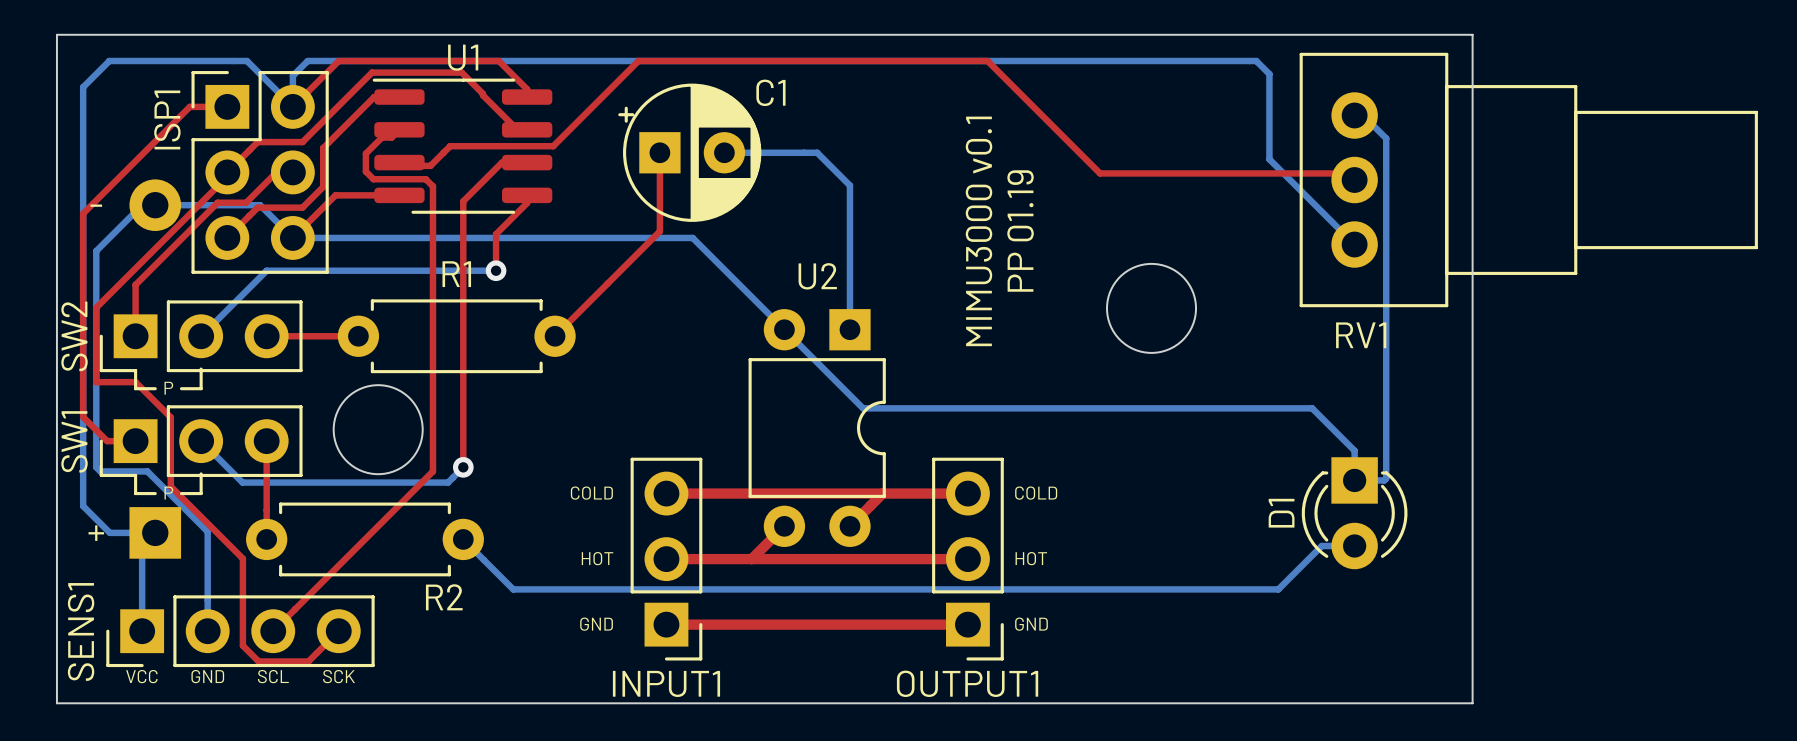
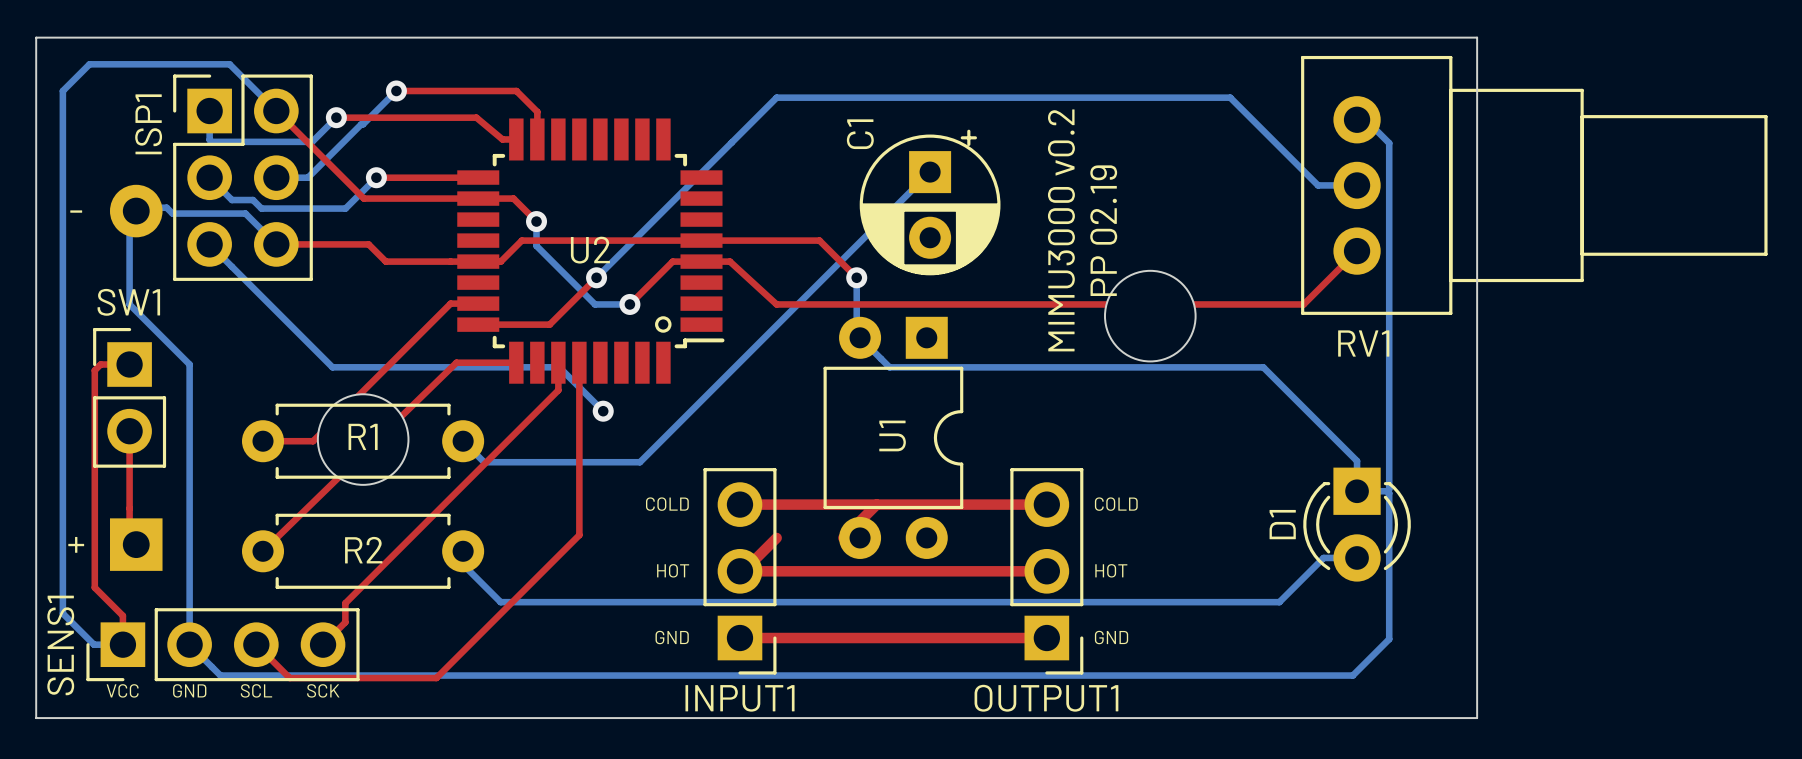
U1 name position: U1 (463, 57) -> U1 (892, 435)
U1 footprint: [372, 78, 553, 214] -> [823, 316, 964, 559]
top track: none -> (396, 90) (516, 90) (537, 111) (537, 139)
bottom track: none -> (396, 90) (307, 177) (276, 177)
via: none -> (396, 90)
C1 name position: C1 (770, 92) -> C1 (860, 134)
top track: (399, 97) (374, 97) (323, 148) (323, 186) (302, 207) (257, 207) (227, 237) -> none
top track: (527, 97) (527, 89) (498, 61) (338, 61) (292, 106) -> (536, 221) (513, 198) (363, 198) (276, 111)
top track: (227, 106) (189, 106) (83, 213) (83, 417) (107, 441) (135, 441) -> none
bottom track: none -> (209, 111) (209, 139) (211, 141) (312, 141) (336, 117)
bottom track: (292, 106) (292, 75) (307, 61) (1256, 61) (1269, 74) (1269, 159) (1354, 244) -> none
top track: none -> (336, 117) (476, 117) (502, 139) (516, 139)
via: none -> (336, 117)
top track: (399, 129) (391, 137) (381, 137) (365, 153) (365, 171) (373, 179) (425, 179) (432, 186) (432, 471) (273, 631) -> (579, 362) (579, 535) (436, 678) (289, 678) (256, 644)
top track: (527, 129) (517, 129) (461, 72) (372, 72) (302, 142) (257, 142) (227, 172) -> none
top track: (659, 152) (659, 231) (555, 336) -> none
C1 rotation: 0° (689, 152) -> 90° clockwise (930, 202)
C1 position: (689, 152) -> (930, 202)
bottom track: (724, 152) (817, 152) (849, 185) (849, 329) -> none
top track: (527, 162) (502, 162) (463, 201) (463, 467) -> none
top track: (397, 165) (430, 165) (450, 146) (553, 146) (638, 61) (987, 61) (1100, 173) (1349, 173) (1354, 178) -> none
bottom track: none -> (930, 172) (639, 462) (484, 462) (463, 441)
bottom track: none -> (209, 177) (231, 200) (253, 200) (261, 208) (345, 208) (376, 177)
top track: (276, 172) (246, 202) (217, 202) (135, 284) (135, 336) -> none
top track: none -> (376, 177) (478, 177)
via: none -> (376, 177)
top track: (227, 176) (96, 307) (96, 382) (135, 382) (170, 417) (170, 486) (242, 558) (242, 645) (258, 661) (308, 661) (338, 631) -> (558, 362) (558, 390) (345, 603) (345, 622) (323, 644)
bottom track: none -> (1357, 185) (1318, 185) (1230, 97) (776, 97) (596, 277)
top track: (399, 195) (335, 195) (292, 237) -> none
top track: (527, 195) (527, 203) (496, 234) (496, 270) -> none
bottom track: (262, 207) (260, 205) (142, 205) (96, 251) (96, 467) (100, 471) (147, 471) (207, 531) -> (245, 213) (172, 213) (166, 207) (129, 207) (129, 304) (189, 364) (189, 543)
bottom track: none -> (536, 221) (536, 245) (595, 304) (629, 304)
via: none -> (536, 221)
text: none -> MIMU3000 v0.2 (1061, 230)
text: none -> PP 02.19 (1103, 230)
text: MIMU3000 v0.1 (979, 231) -> none
text: PP 01.19 (1020, 231) -> none
bottom track: none -> (209, 244) (332, 367) (559, 367) (603, 411)
bottom track: (292, 237) (692, 237) (863, 408) (1312, 408) -> (856, 277) (856, 334) (889, 367) (1263, 367) (1313, 417)
top track: none -> (1357, 251) (1303, 304) (776, 304) (729, 261) (672, 261) (629, 304)
top track: none -> (286, 254) (276, 244) (368, 244) (385, 261) (500, 261) (521, 240) (819, 240) (856, 277)
bottom track: (496, 270) (266, 270) (207, 329) -> none
via: (496, 270) -> none
top track: none -> (596, 277) (549, 324) (478, 324)
via: none -> (596, 277)
via: none -> (856, 277)
R1 name position: R1 (456, 274) -> R1 (363, 436)
U2 name position: U2 (817, 276) -> U2 (590, 250)
top track: none -> (478, 303) (450, 303) (313, 441) (263, 441)
via: none -> (629, 304)
drawing: none -> [655, 316, 672, 333]
U2 footprint: [748, 309, 886, 547] -> [457, 118, 725, 384]
SW2: (201, 336) -> none
top track: (266, 336) (358, 336) -> none
R1 position: (456, 336) -> (363, 441)
top track: none -> (516, 362) (456, 362) (263, 551)
top track: none -> (129, 364) (100, 364) (94, 370) (94, 587) (122, 615) (122, 644)
line: (201, 369) (201, 388) (181, 388) -> none
line: (135, 370) (135, 388) (155, 388) -> none
text: P (168, 388) -> none
via: none -> (603, 411)
SW1 footprint: [99, 405, 303, 478] -> [93, 328, 167, 468]
top track: none -> (129, 431) (129, 541)
SW1 name position: SW1 (74, 441) -> SW1 (128, 302)
bottom track: (201, 441) (242, 482) (448, 482) (463, 467) -> none
top track: (266, 441) (266, 539) -> none
via: (463, 467) -> none
line: (201, 473) (201, 493) (181, 493) -> none
line: (135, 475) (135, 493) (155, 493) -> none
bottom track: none -> (1387, 491) (1389, 493) (1389, 639) (1352, 675) (220, 675) (189, 644)
text: P (168, 493) -> none
text position: COLD (591, 493) -> COLD (667, 504)
top track: (666, 493) (748, 493) -> (963, 504) (1046, 504)
text position: COLD (1036, 493) -> COLD (1116, 504)
bottom track: (83, 506) (109, 532) (142, 532) (142, 631) -> (62, 517) (62, 613) (94, 644) (122, 644)
R2 position: (364, 539) -> (363, 551)
text position: HOT (597, 558) -> HOT (673, 570)
text position: HOT (1031, 558) -> HOT (1111, 570)
top track: (666, 559) (748, 559) -> (963, 571) (1046, 571)
INPUT1 position: (666, 559) -> (739, 571)
OUTPUT1 position: (967, 559) -> (1046, 571)
R2 name position: R2 (444, 597) -> R2 (363, 550)
text position: GND (596, 624) -> GND (672, 637)
top track: (666, 624) (748, 624) -> (963, 638) (1046, 638)
text position: GND (1031, 624) -> GND (1111, 637)

